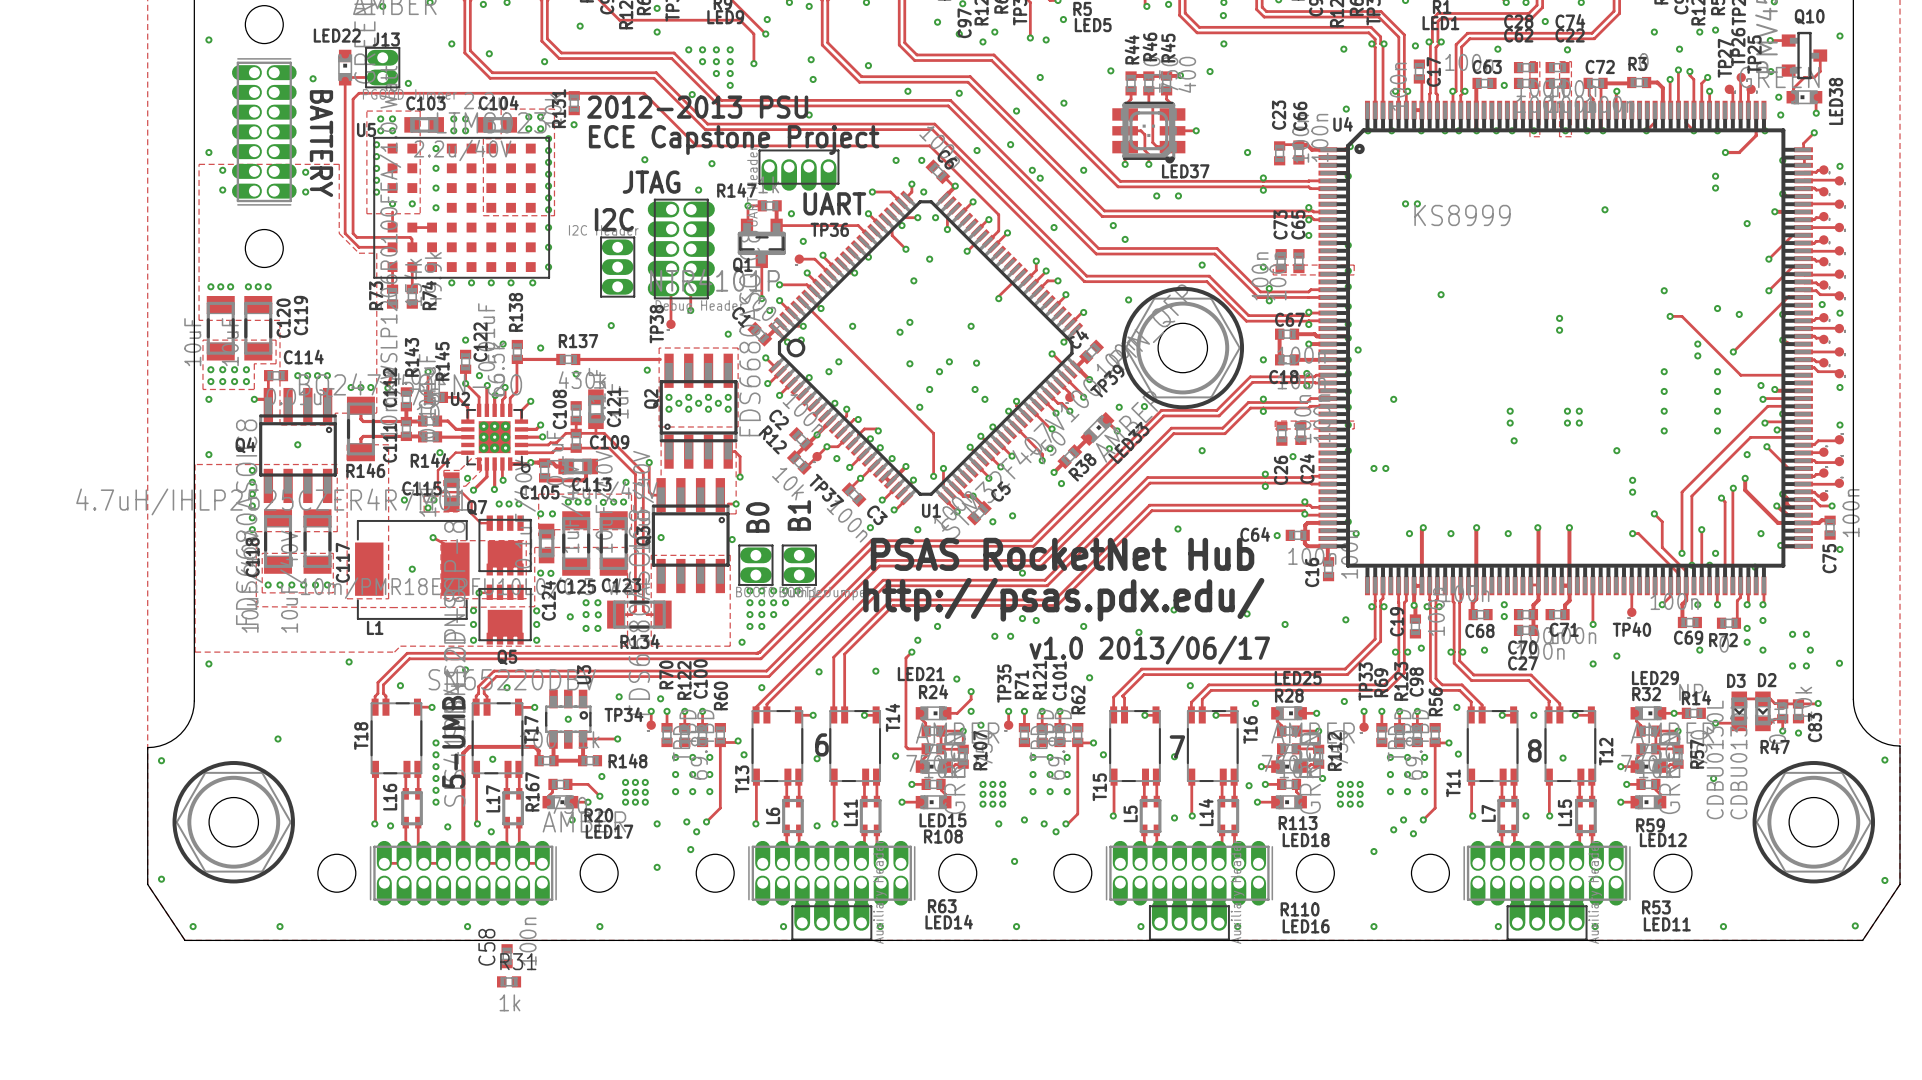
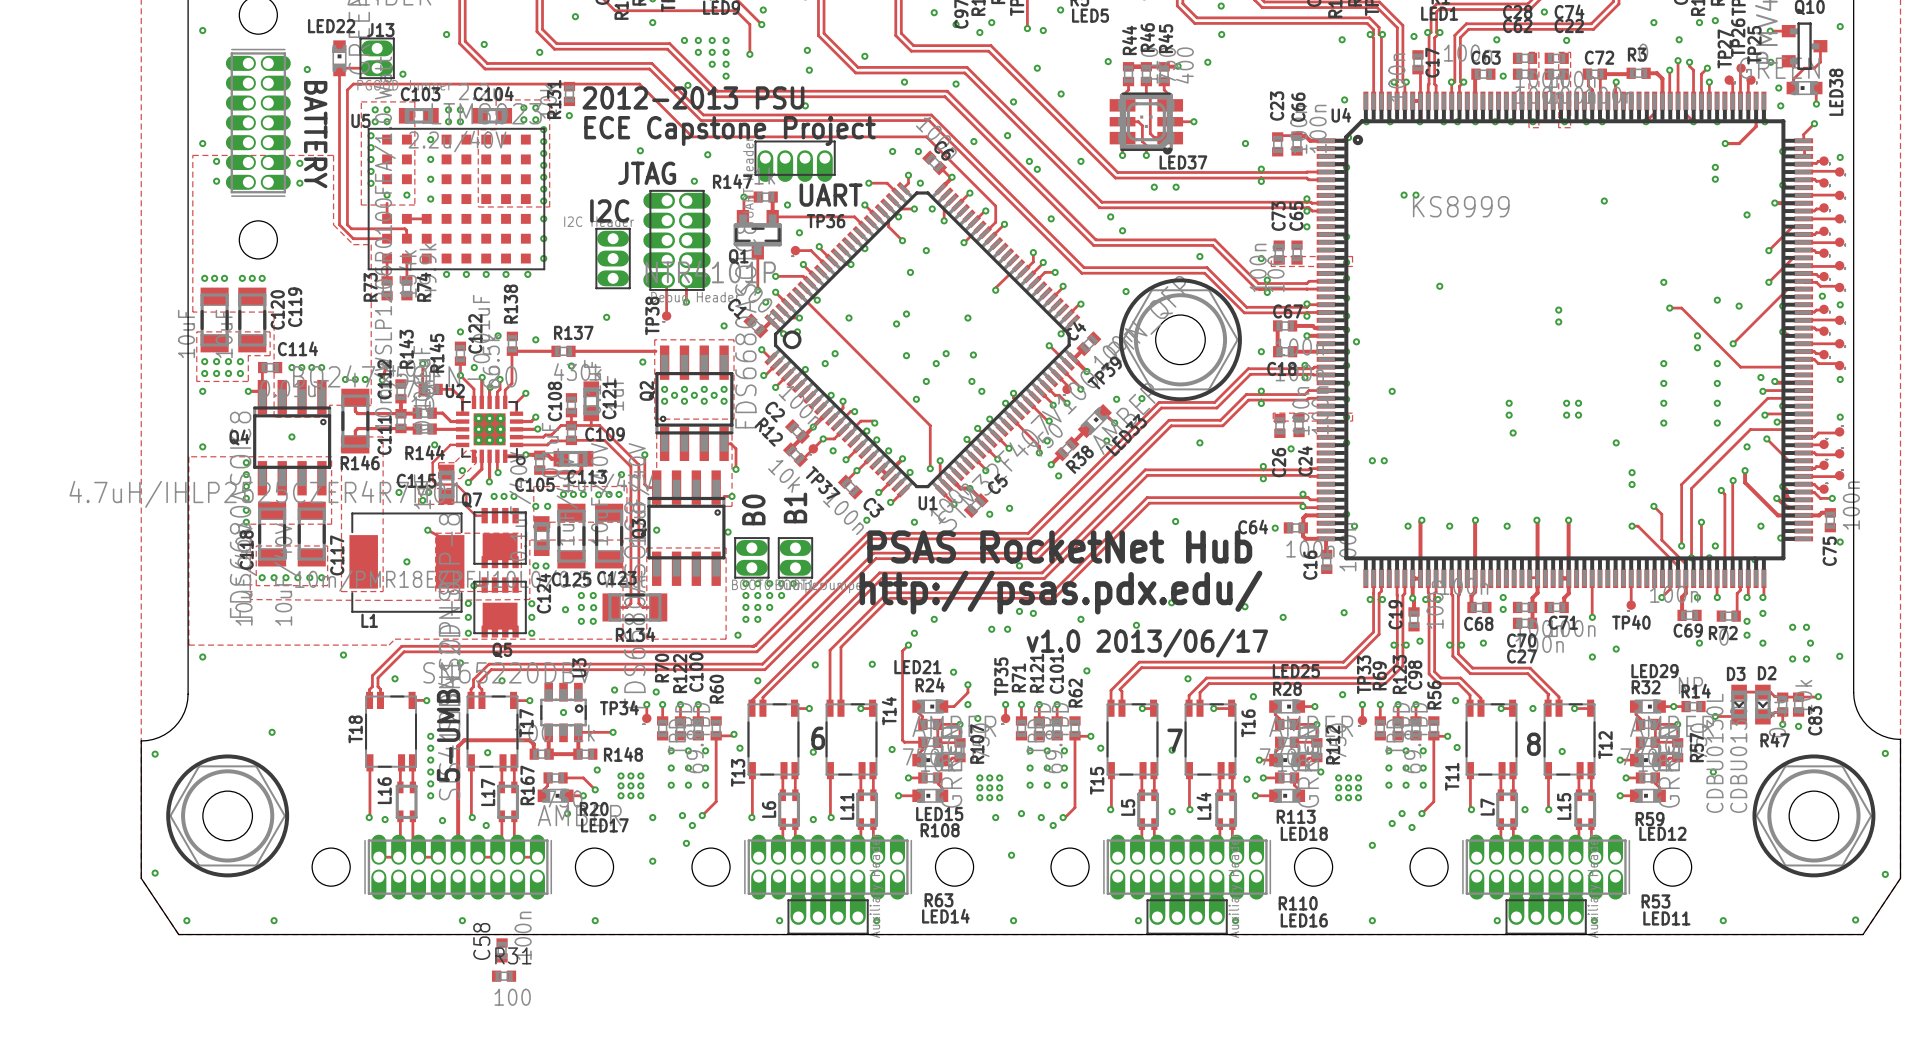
R31 value: 1k (509, 1002) -> 100 (512, 997)

